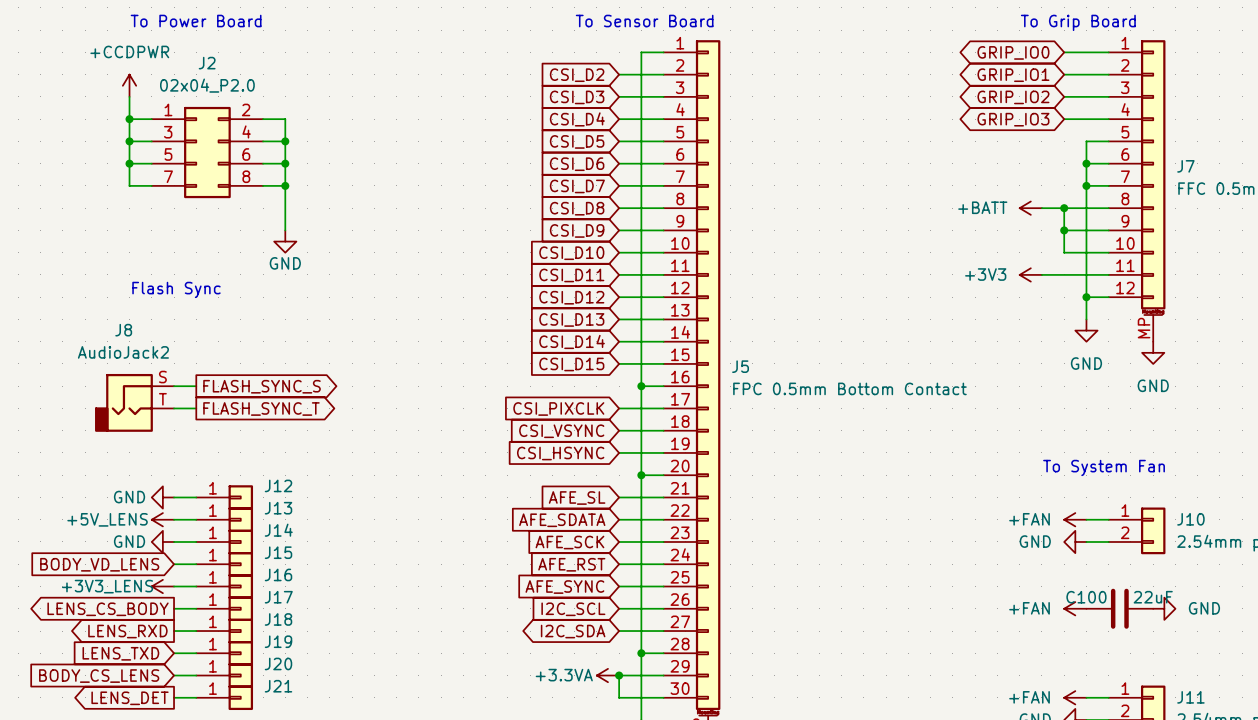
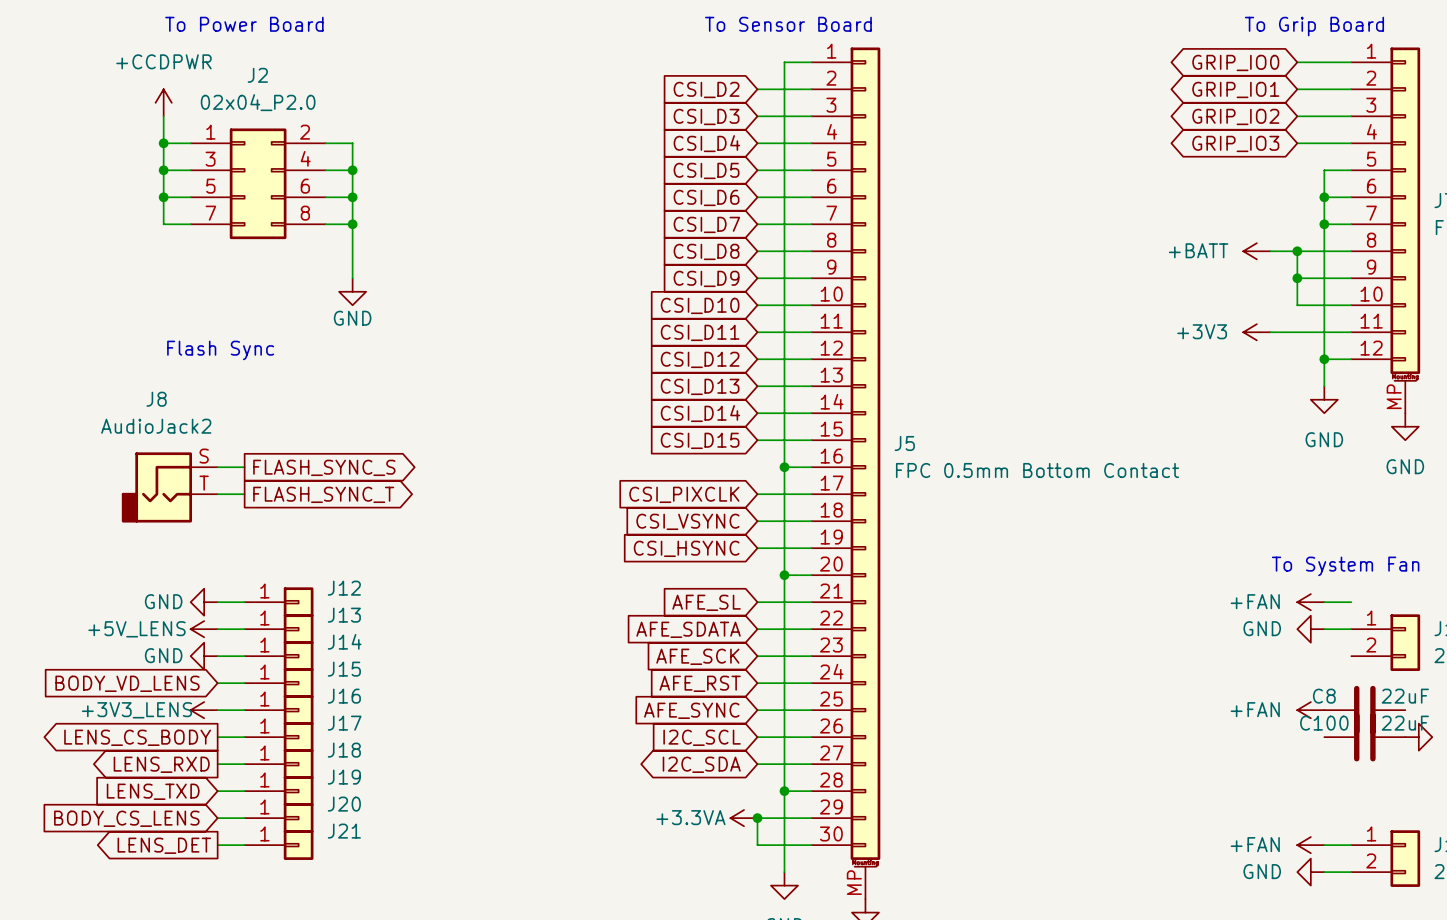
power symbol: none -> +FAN (1310, 602)
power symbol: +FAN (1075, 519) -> GND (1310, 629)
power symbol: GND (1075, 541) -> none
wire: (1086, 541) (1108, 541) -> (1324, 602) (1351, 602)
C8: none -> 22uF (1364, 710)
power symbol position: +FAN (1075, 608) -> +FAN (1310, 710)

